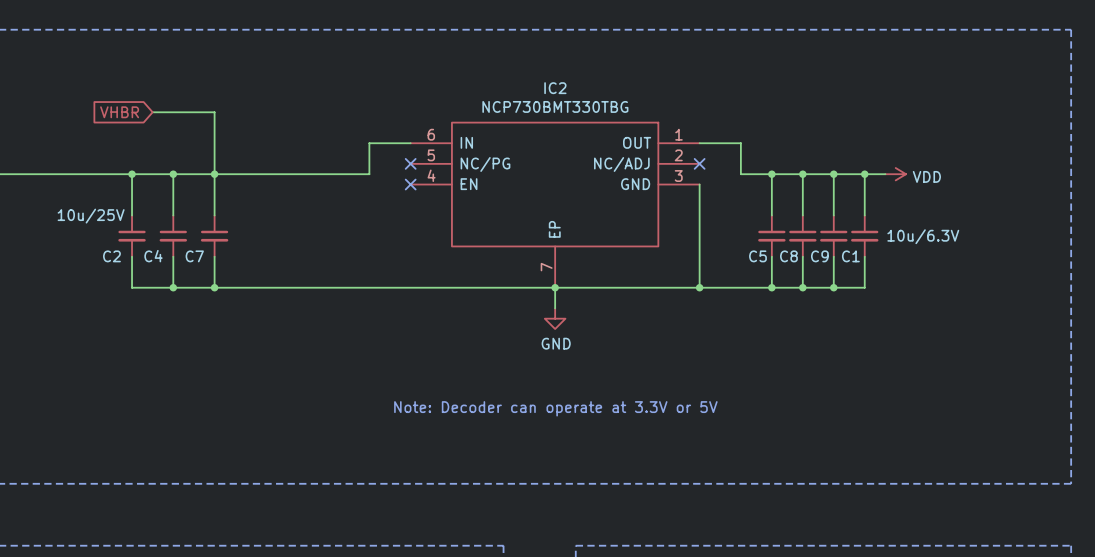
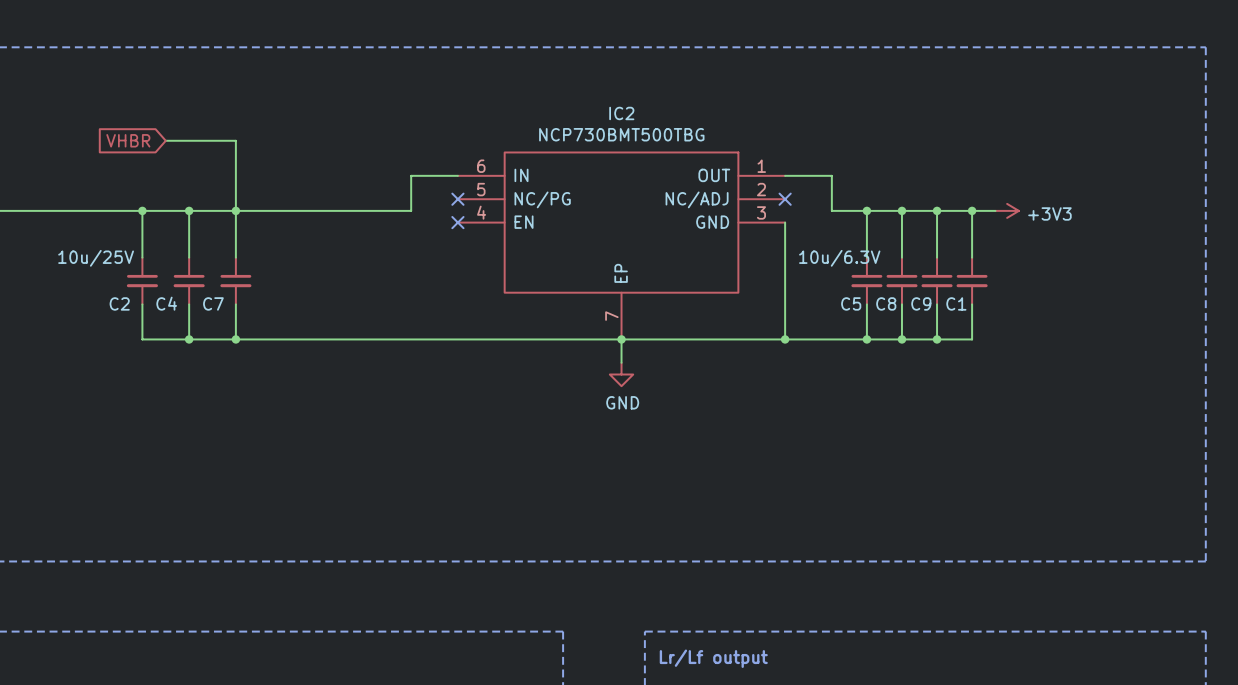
IC2 value: NCP730BMT330TBG (555, 106) -> NCP730BMT500TBG (621, 134)
power symbol: VDD (895, 174) -> +3V3 (1007, 210)
C5 value position: 10u/6.3V (923, 236) -> 10u/6.3V (839, 258)
text: Note: Decoder can operate at 3.3V or 5V (555, 408) -> none

